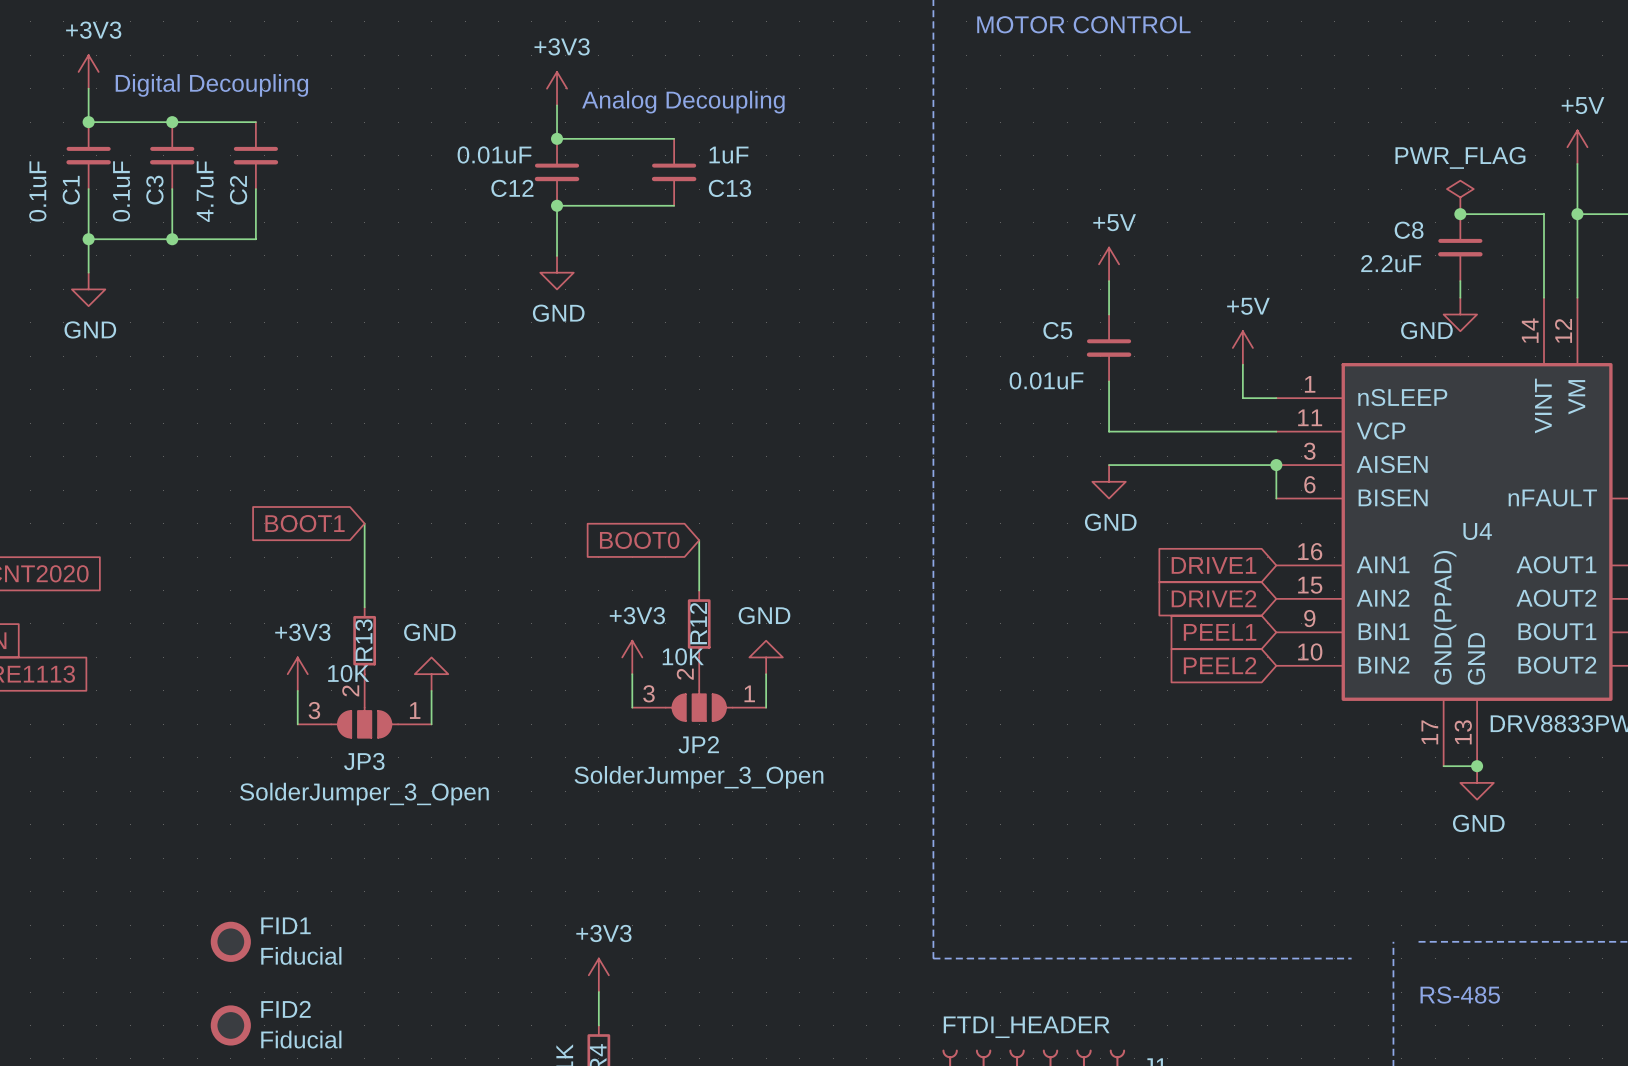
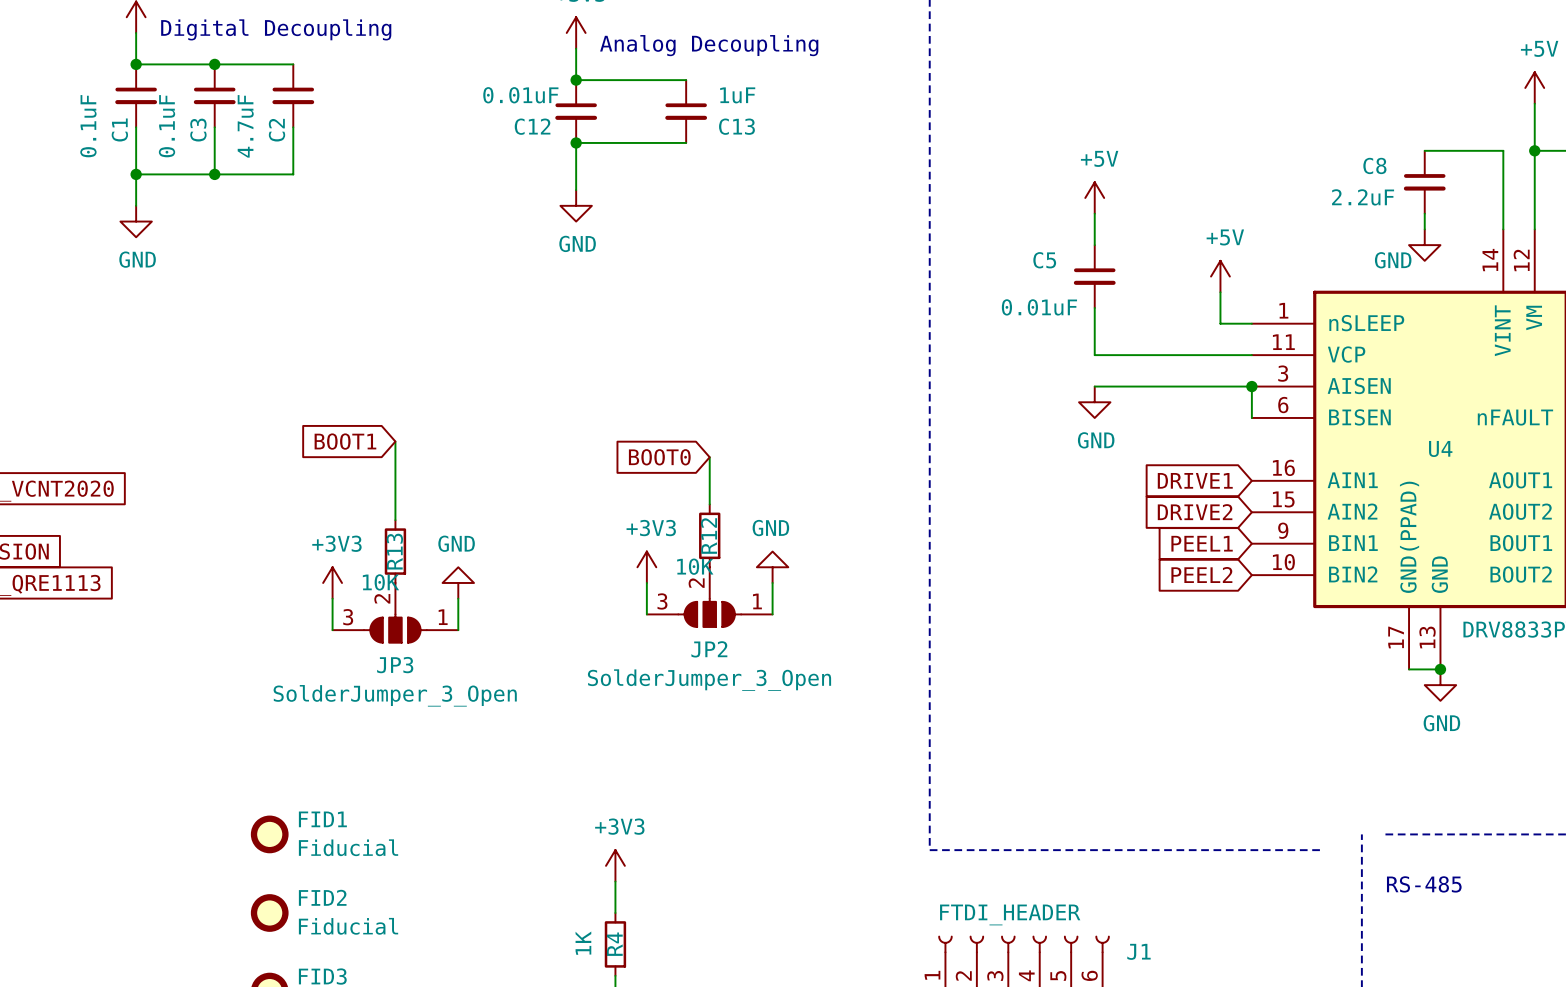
power symbol: PWR_FLAG (1460, 197) -> none
junction: (1460, 214) -> none

